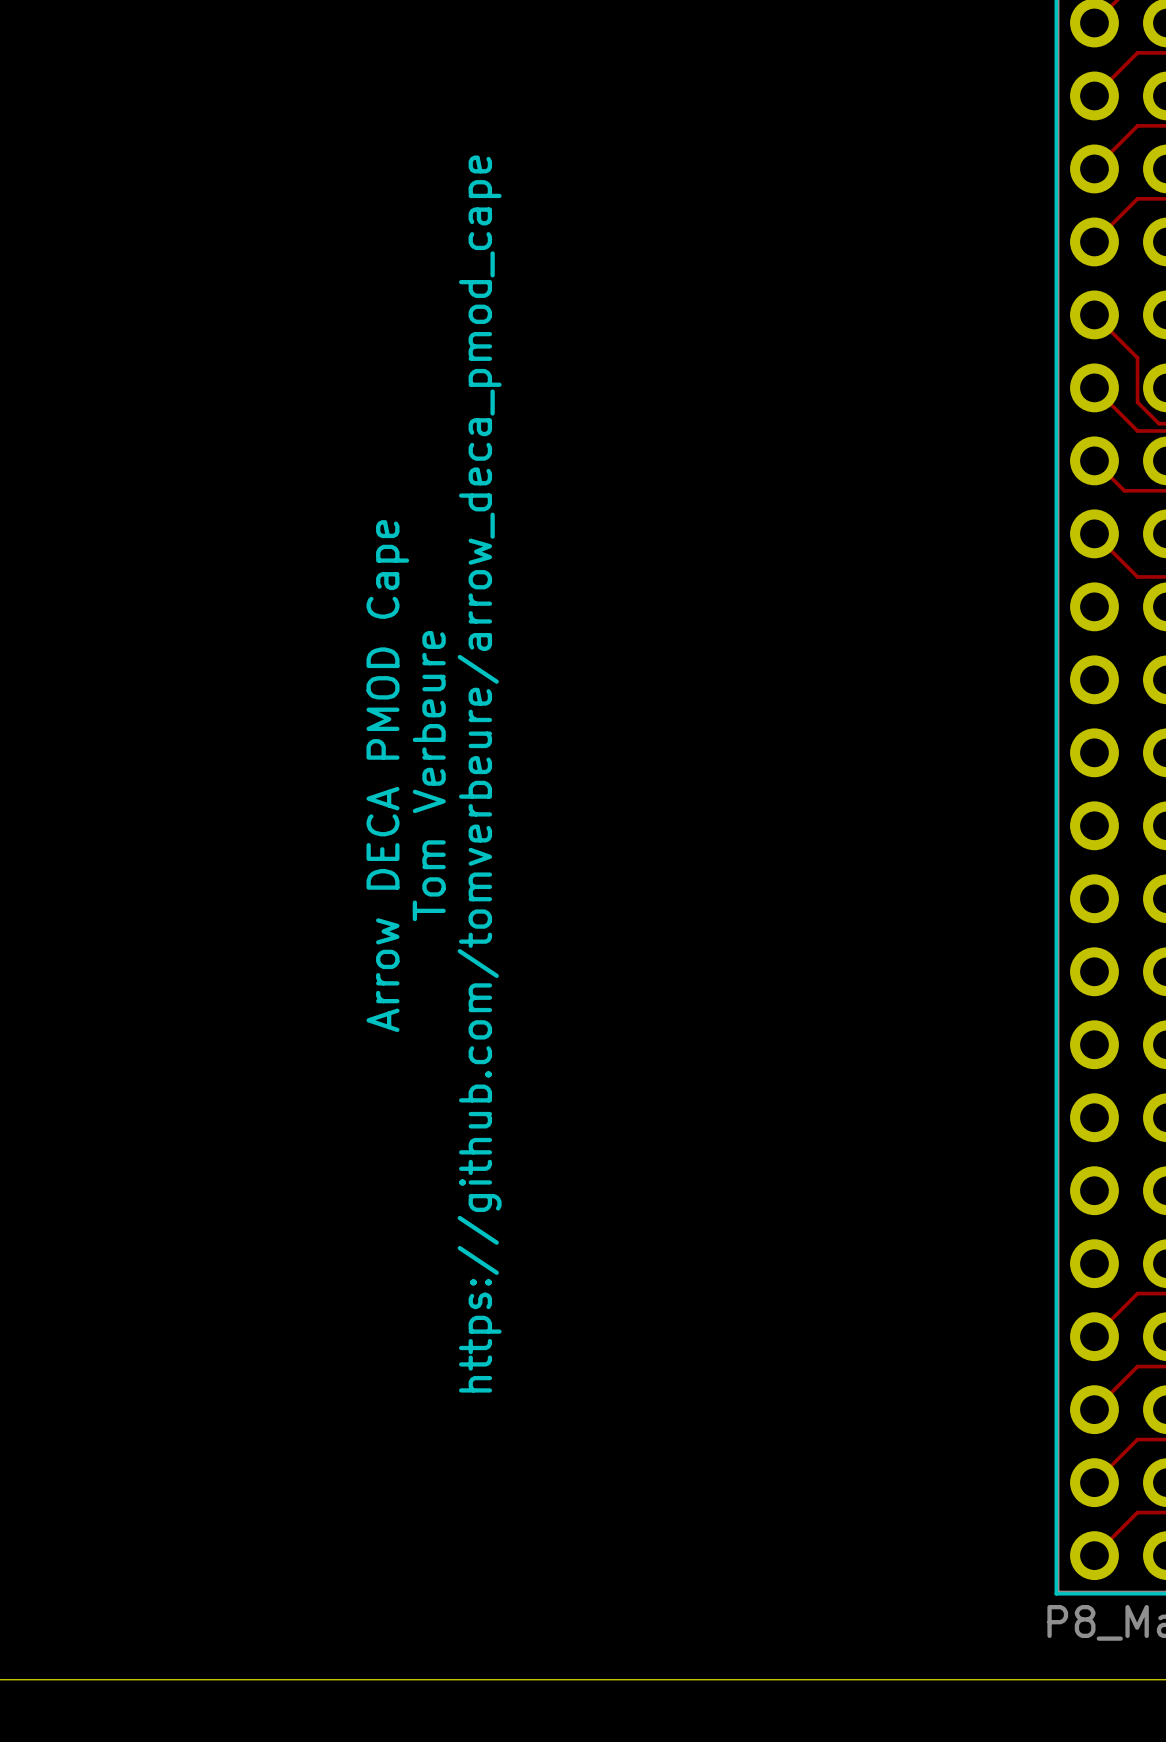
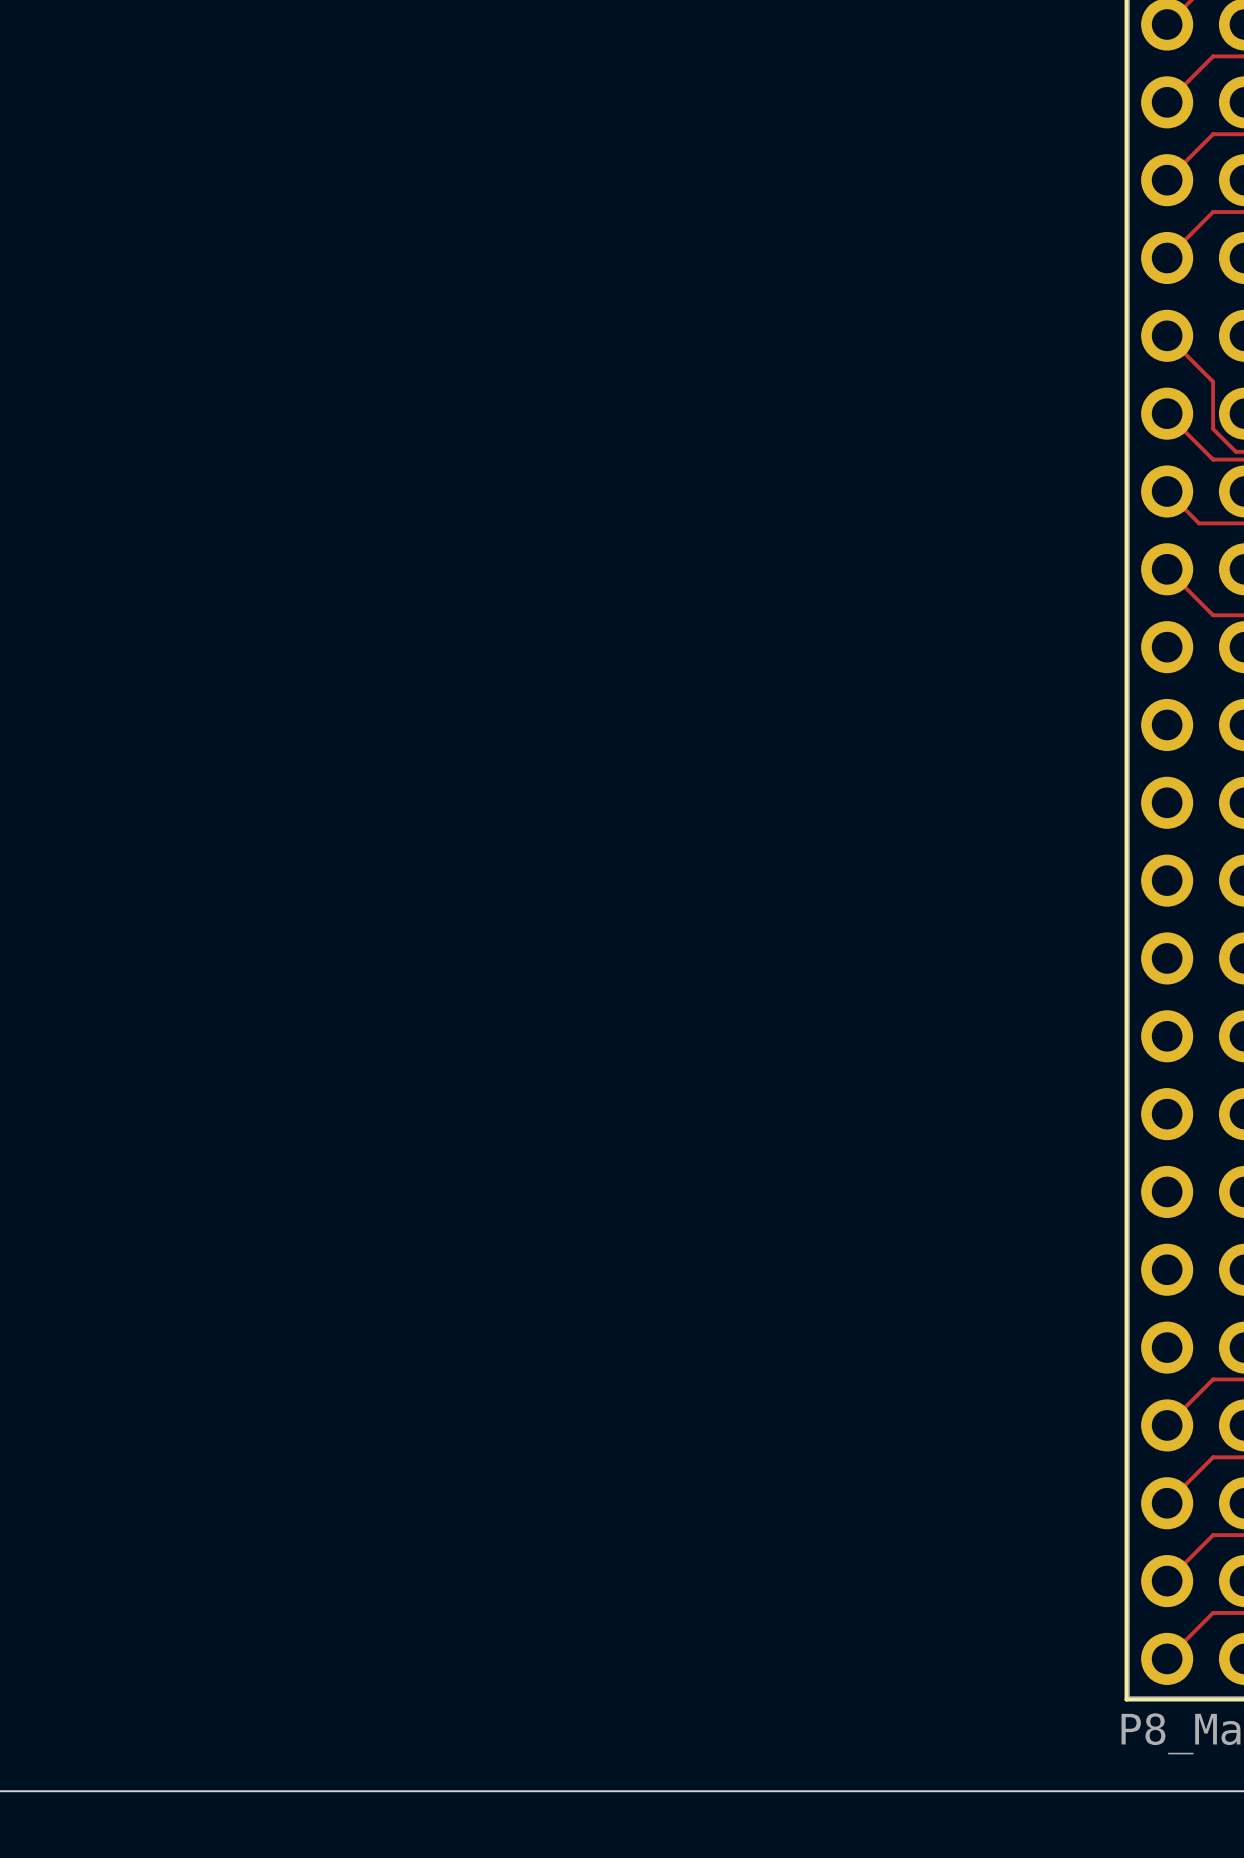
text: https://github.com/tomverbeure/arrow_deca_pmod_cape (479, 774) -> none
text: Arrow DECA PMOD Cape (387, 776) -> none
text: Tom Verbeure (429, 776) -> none

